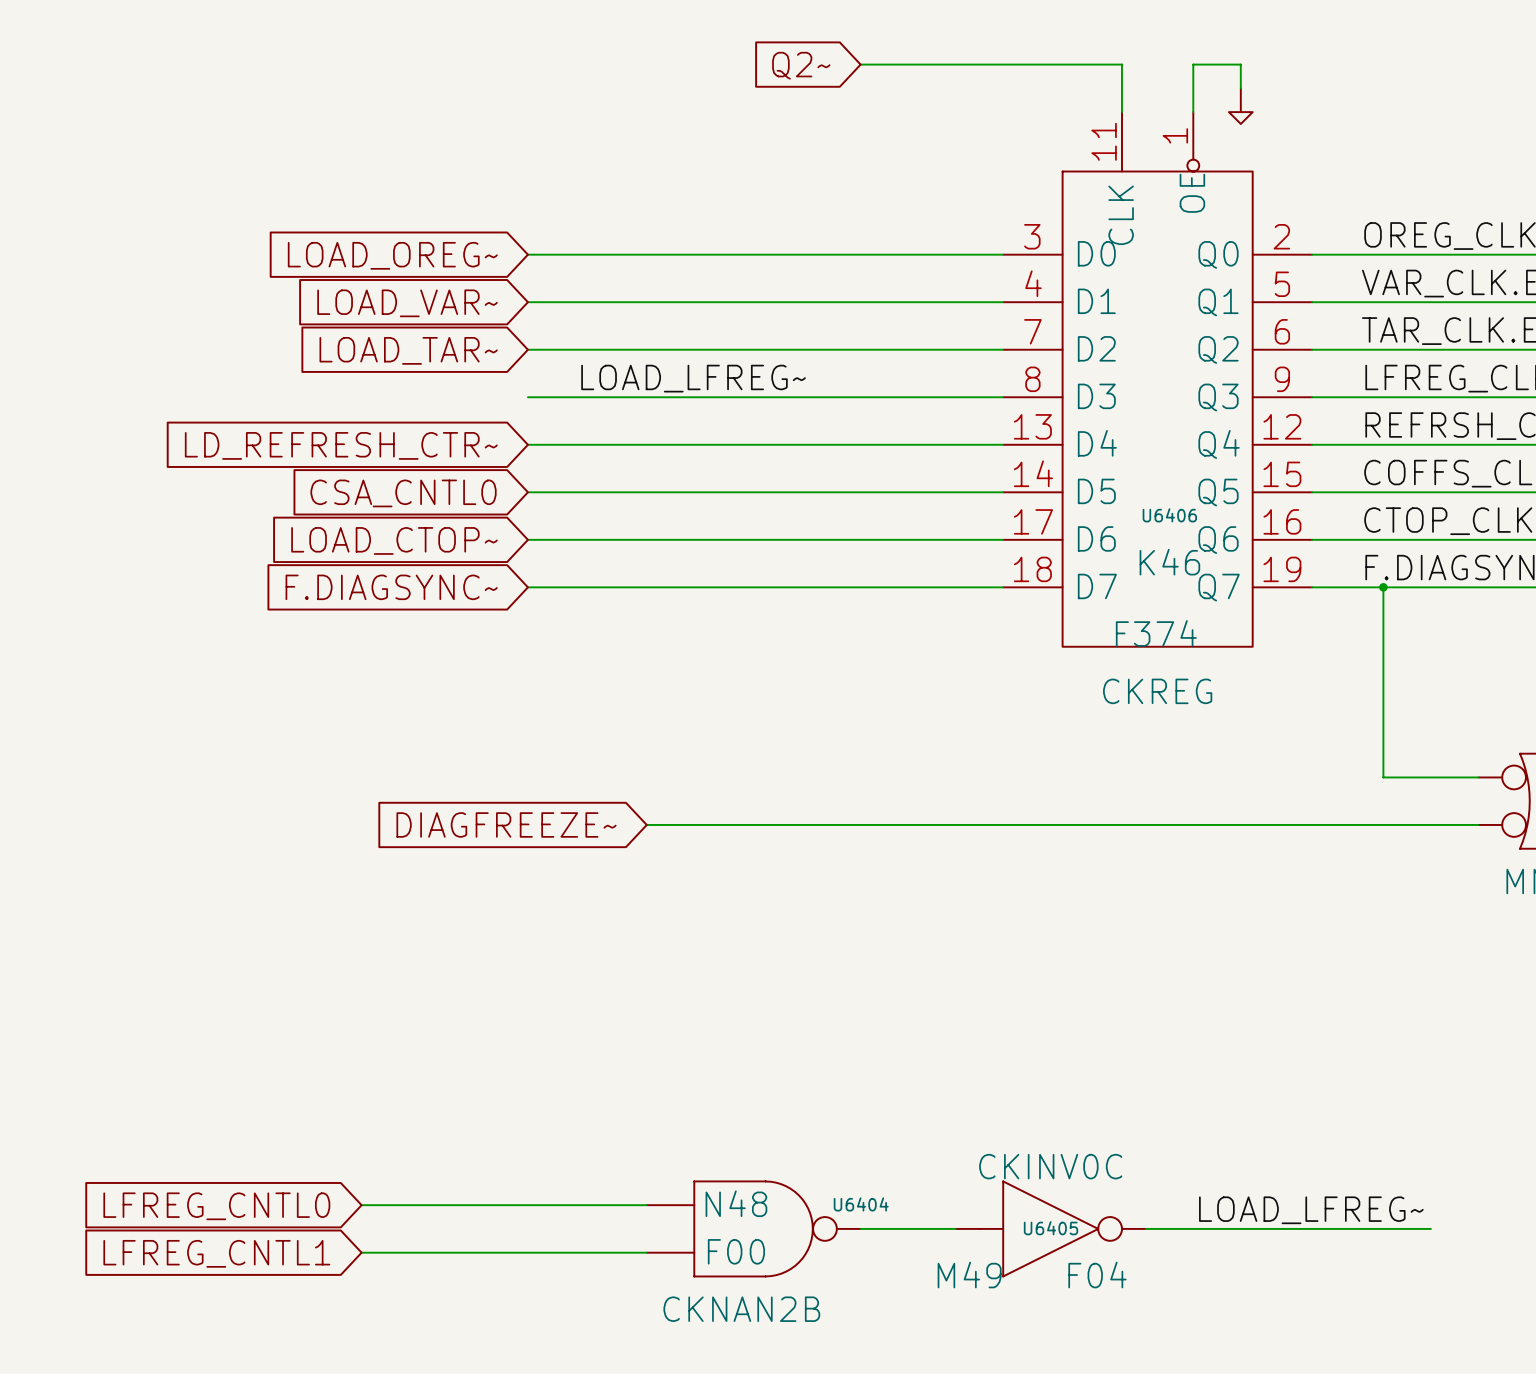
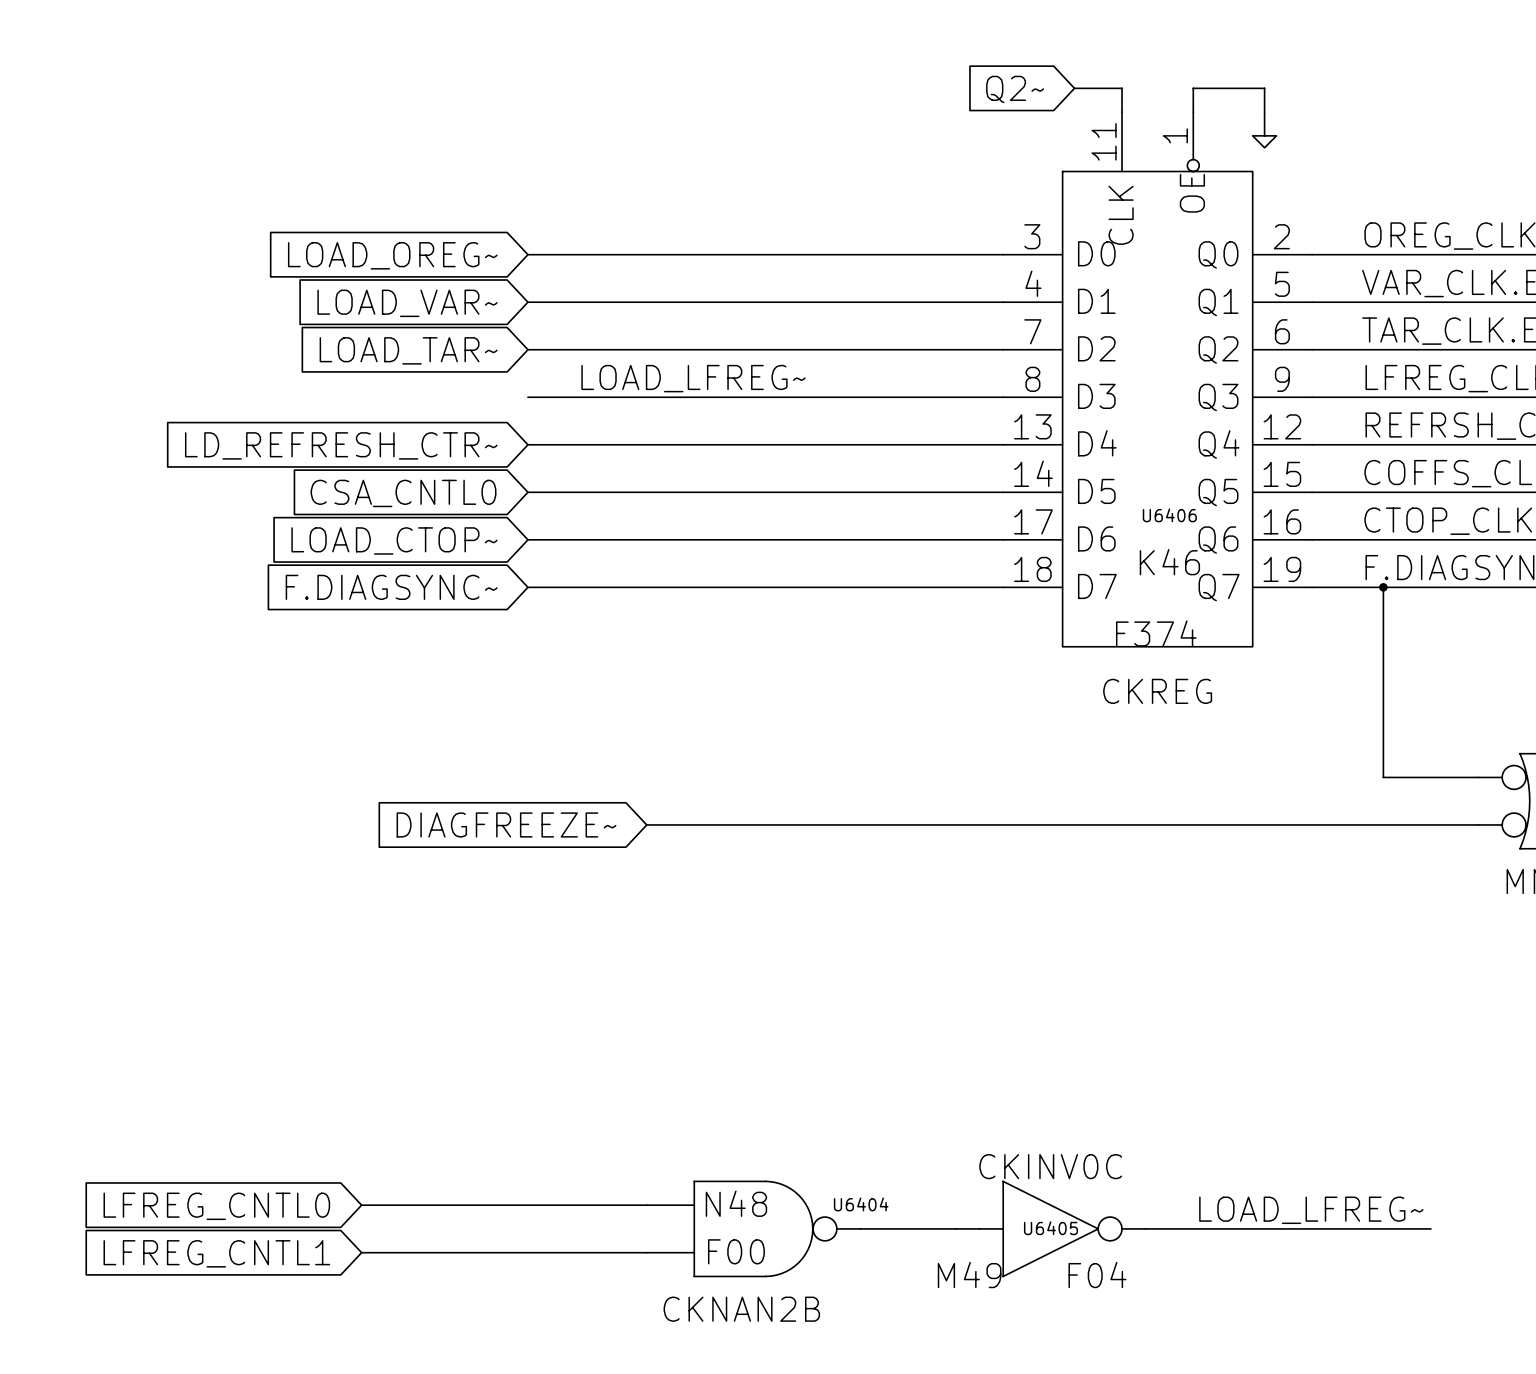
wire: (860, 64) (1122, 64) (1122, 88) -> (1074, 88) (1122, 88)
global label position: Q2~ (801, 65) -> Q2~ (1015, 89)
wire: (1193, 88) (1193, 64) (1240, 64) (1240, 88) -> (1193, 88) (1264, 88) (1264, 112)
power symbol position: (1240, 106) -> (1264, 130)

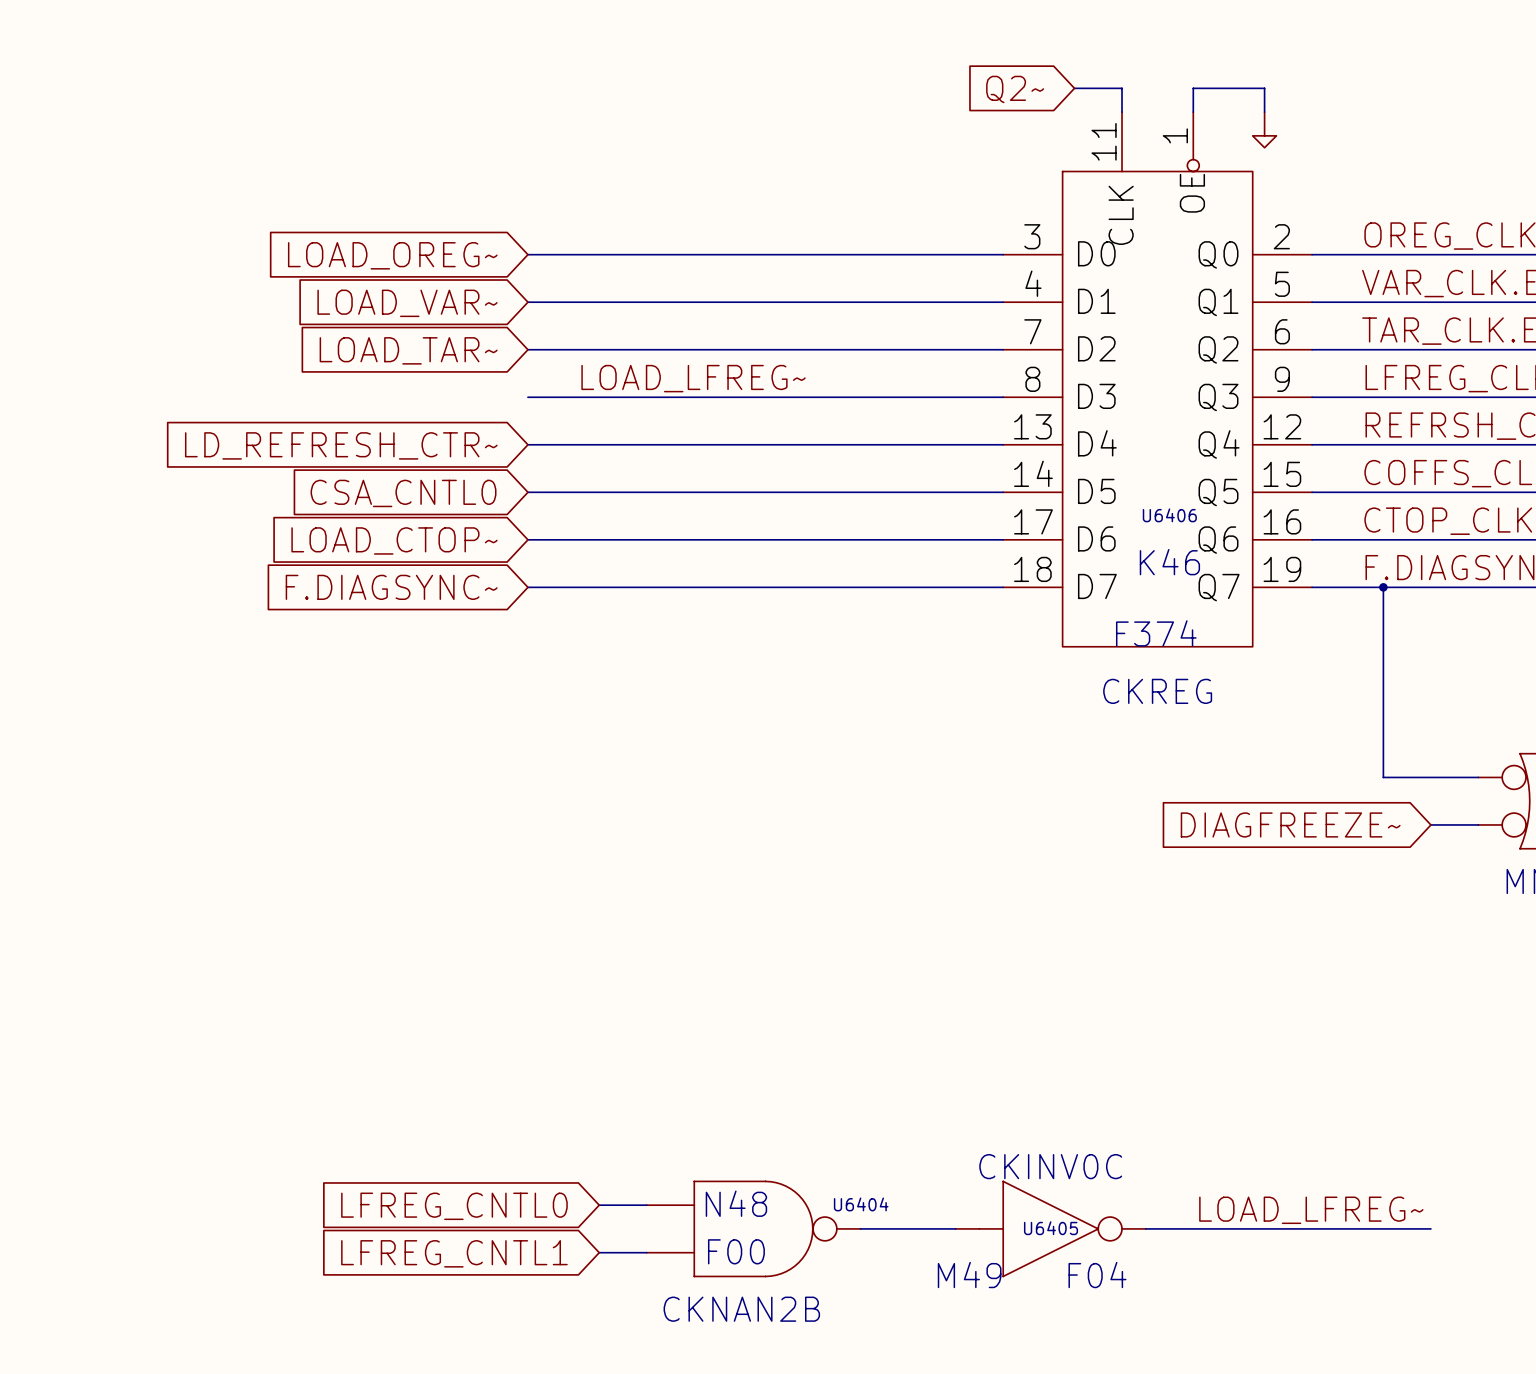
global label: DIAGFREEZE~ (506, 824) -> none
wire: (646, 824) (1430, 824) -> none
global label: none -> DIAGFREEZE~ (1290, 824)
wire: (361, 1205) (599, 1205) -> none
global label: LFREG_CNTL0 (216, 1206) -> none
global label: none -> LFREG_CNTL0 (454, 1206)
wire: (361, 1252) (599, 1252) -> none
global label: LFREG_CNTL1 (216, 1253) -> none
global label: none -> LFREG_CNTL1 (454, 1253)

